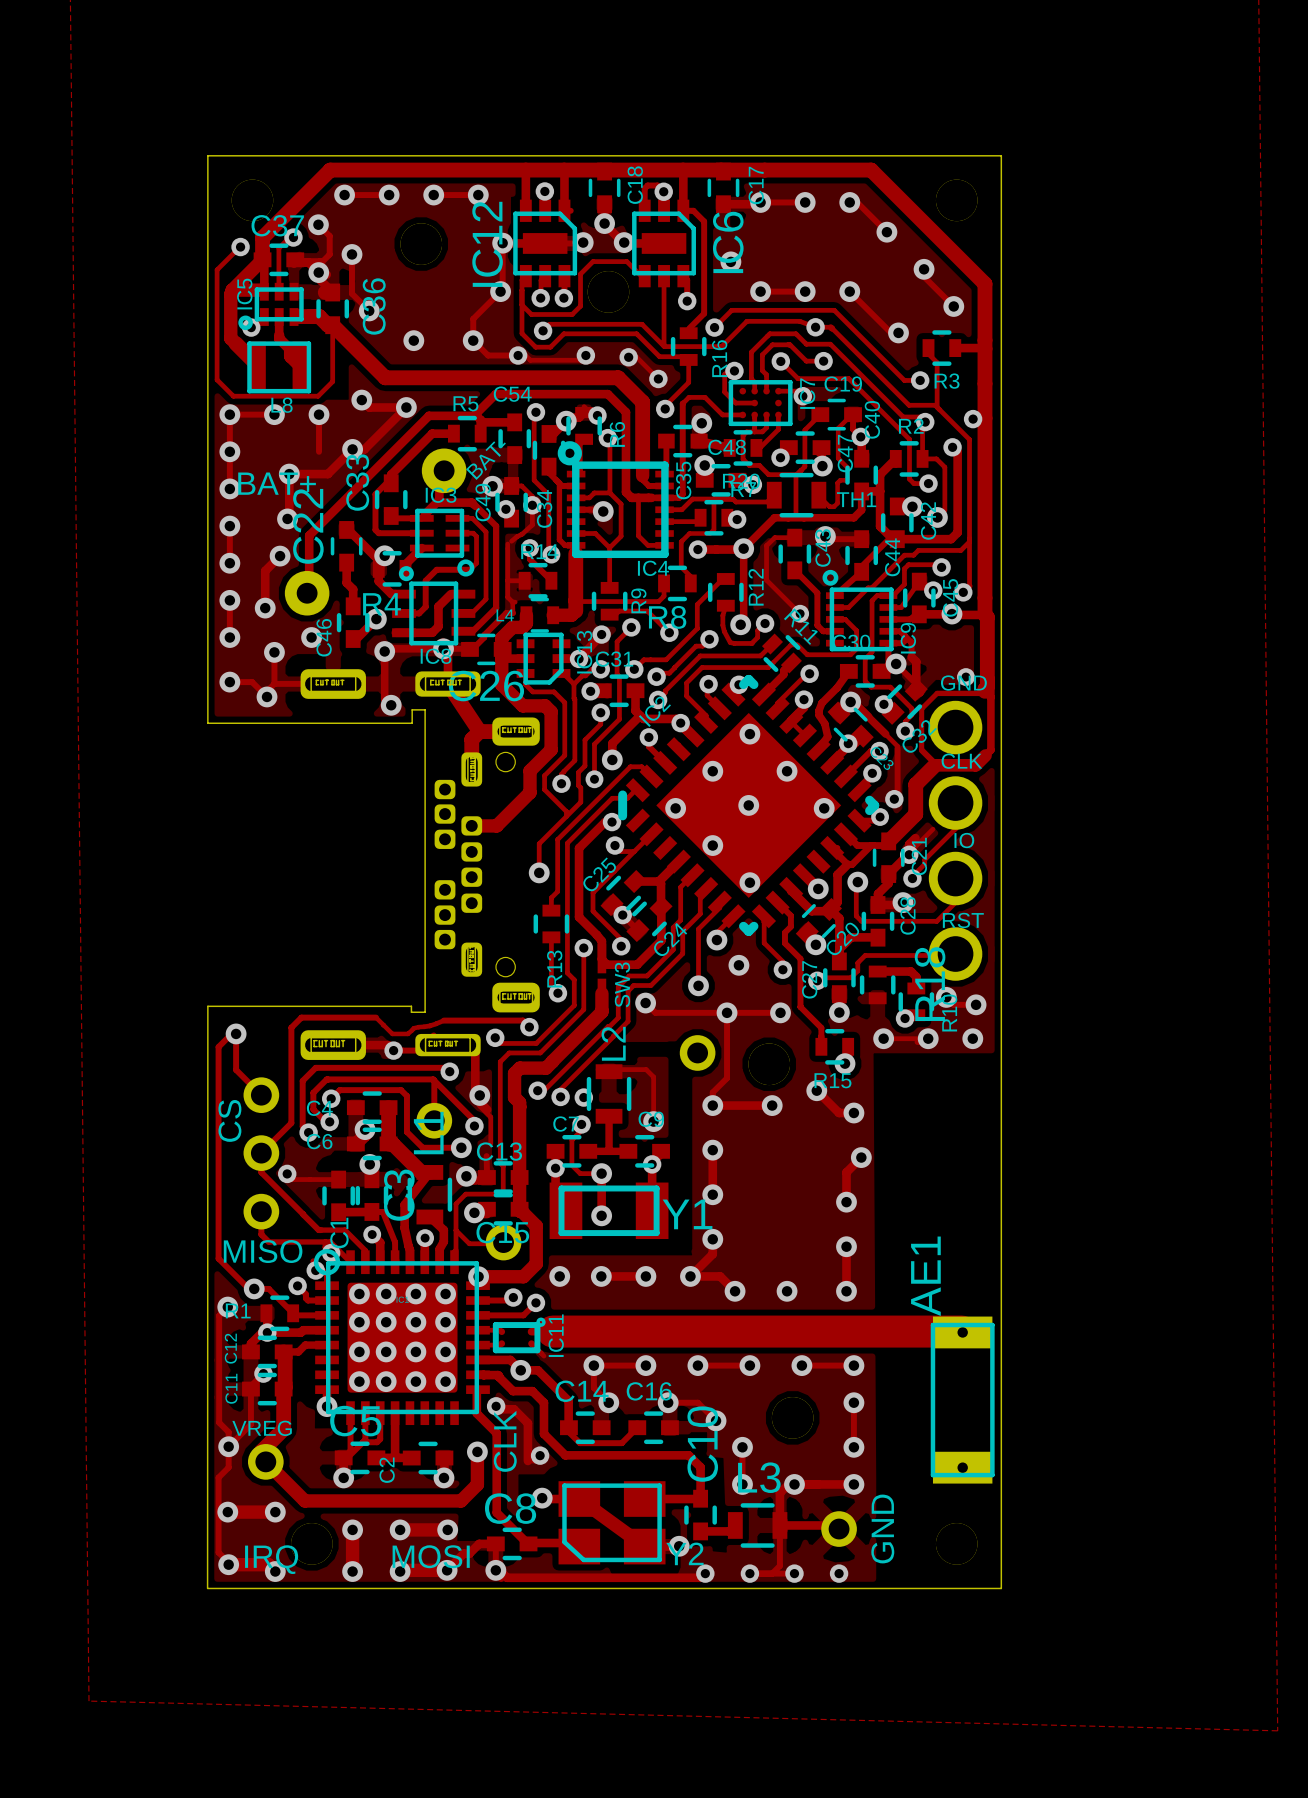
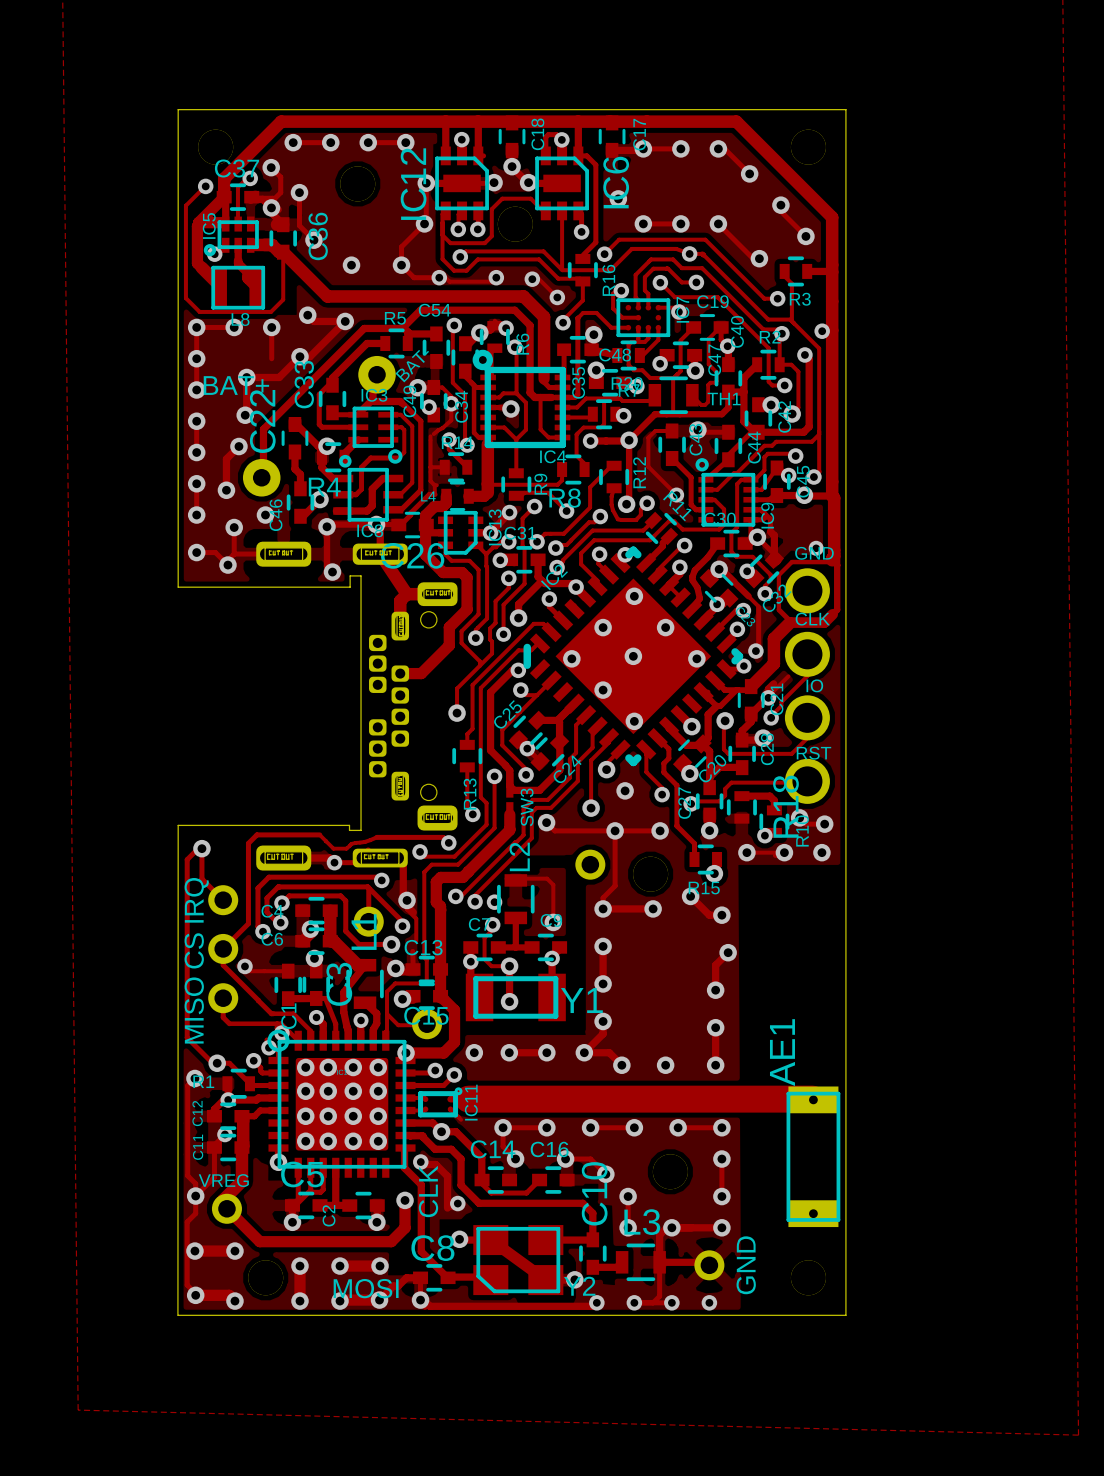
text position: CS (229, 1120) -> CS (194, 950)
text rotation: 0° (263, 1251) -> 90° counterclockwise (194, 1010)
text rotation: 0° (271, 1559) -> 90° counterclockwise (196, 900)
text position: IRQ (271, 1559) -> IRQ (196, 900)

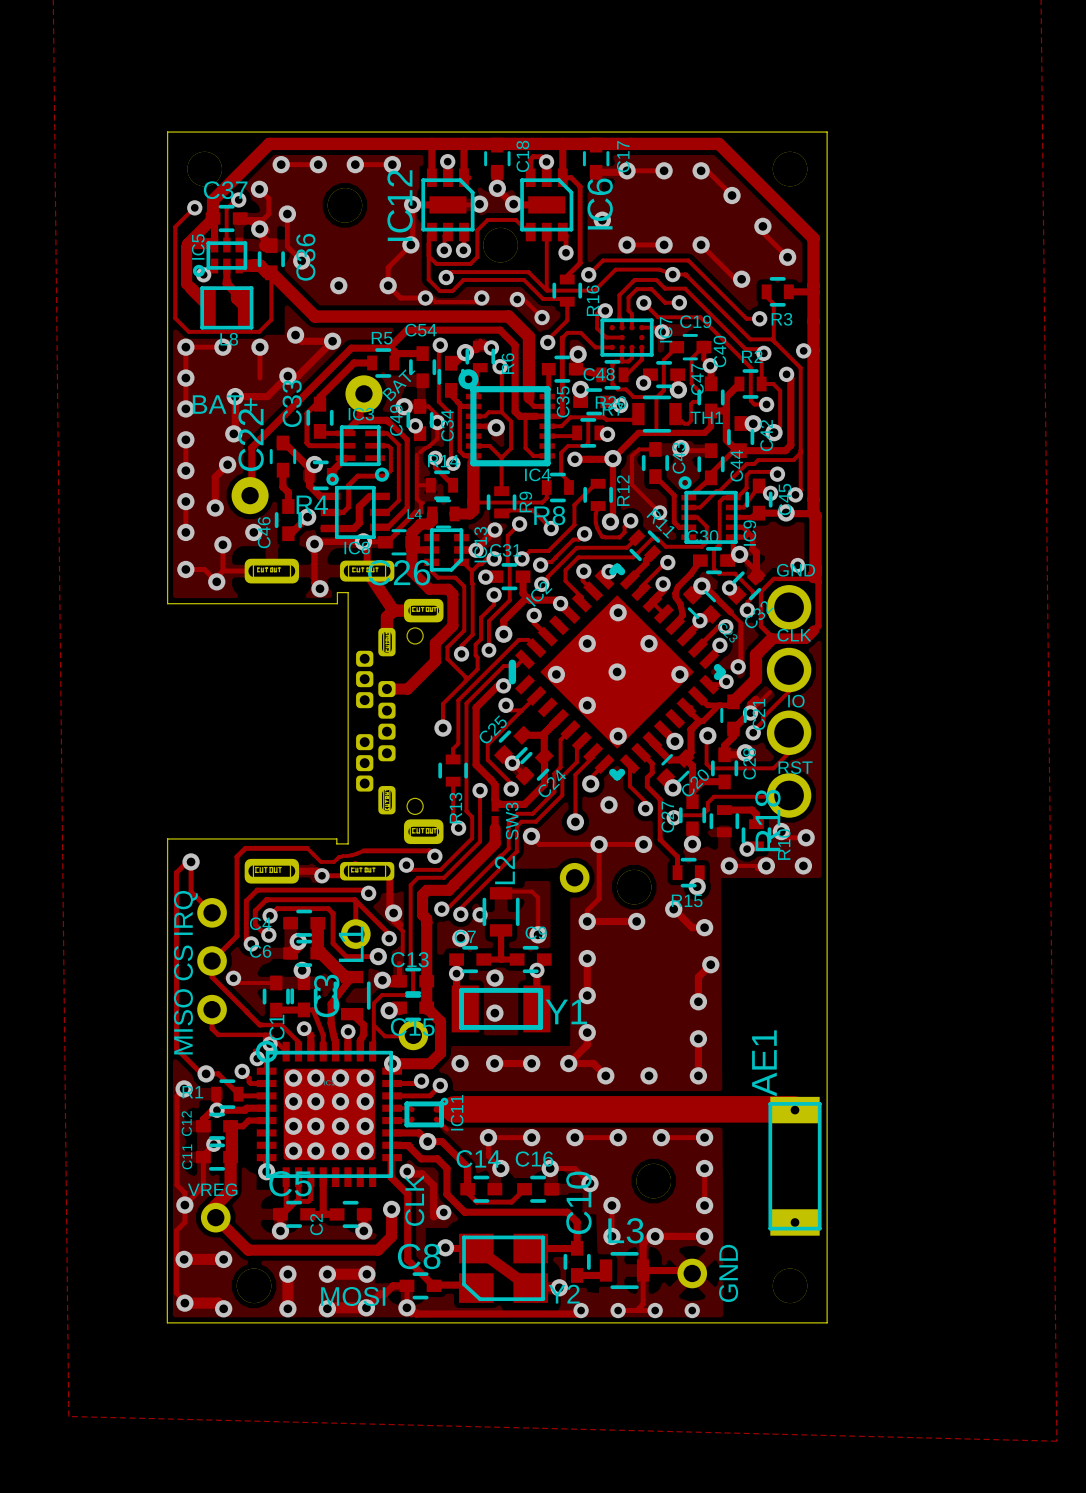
track: (492, 924) (492, 929) (484, 937) (484, 959) (491, 966) (509, 966) (509, 1001) -> none
via: (492, 924) -> none
via: none -> (460, 938)

